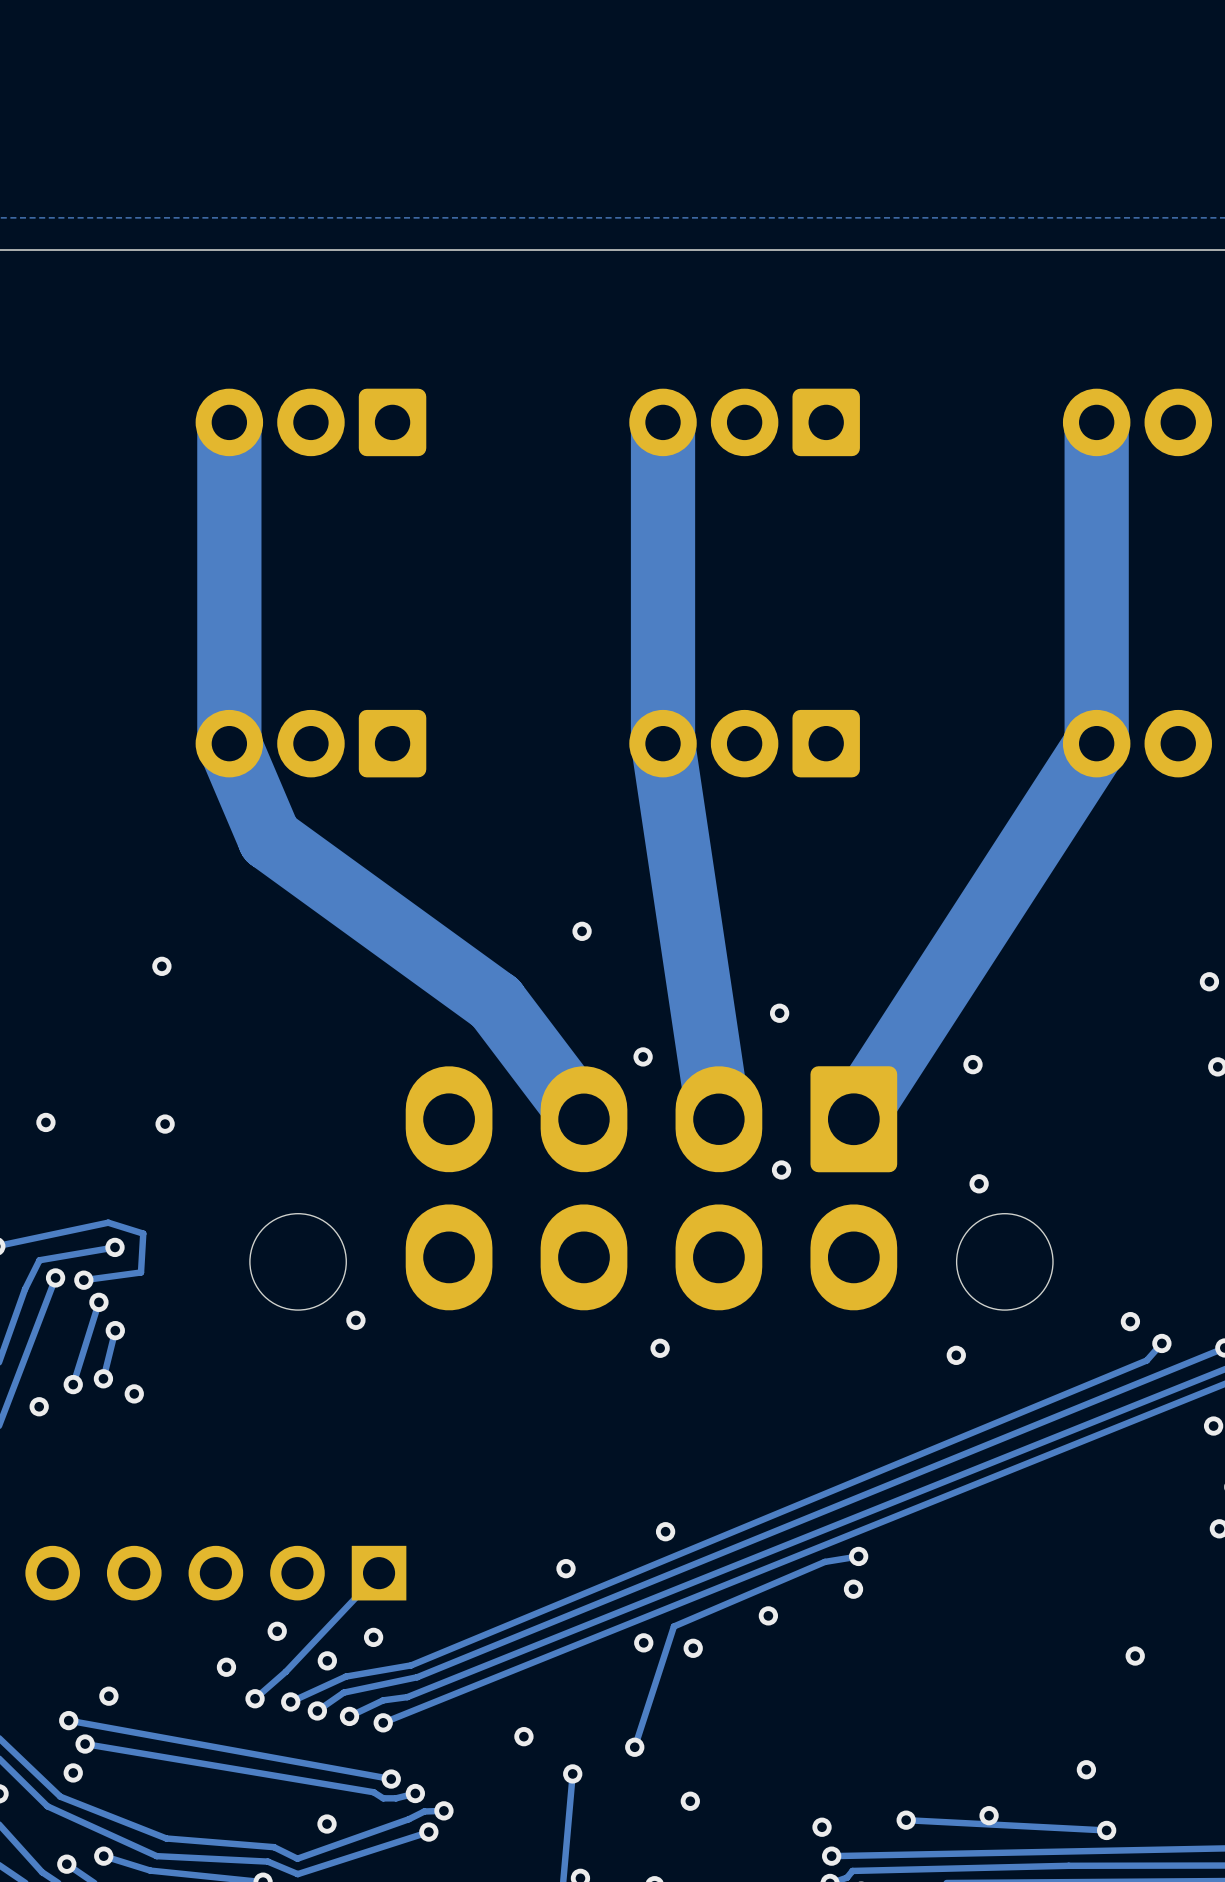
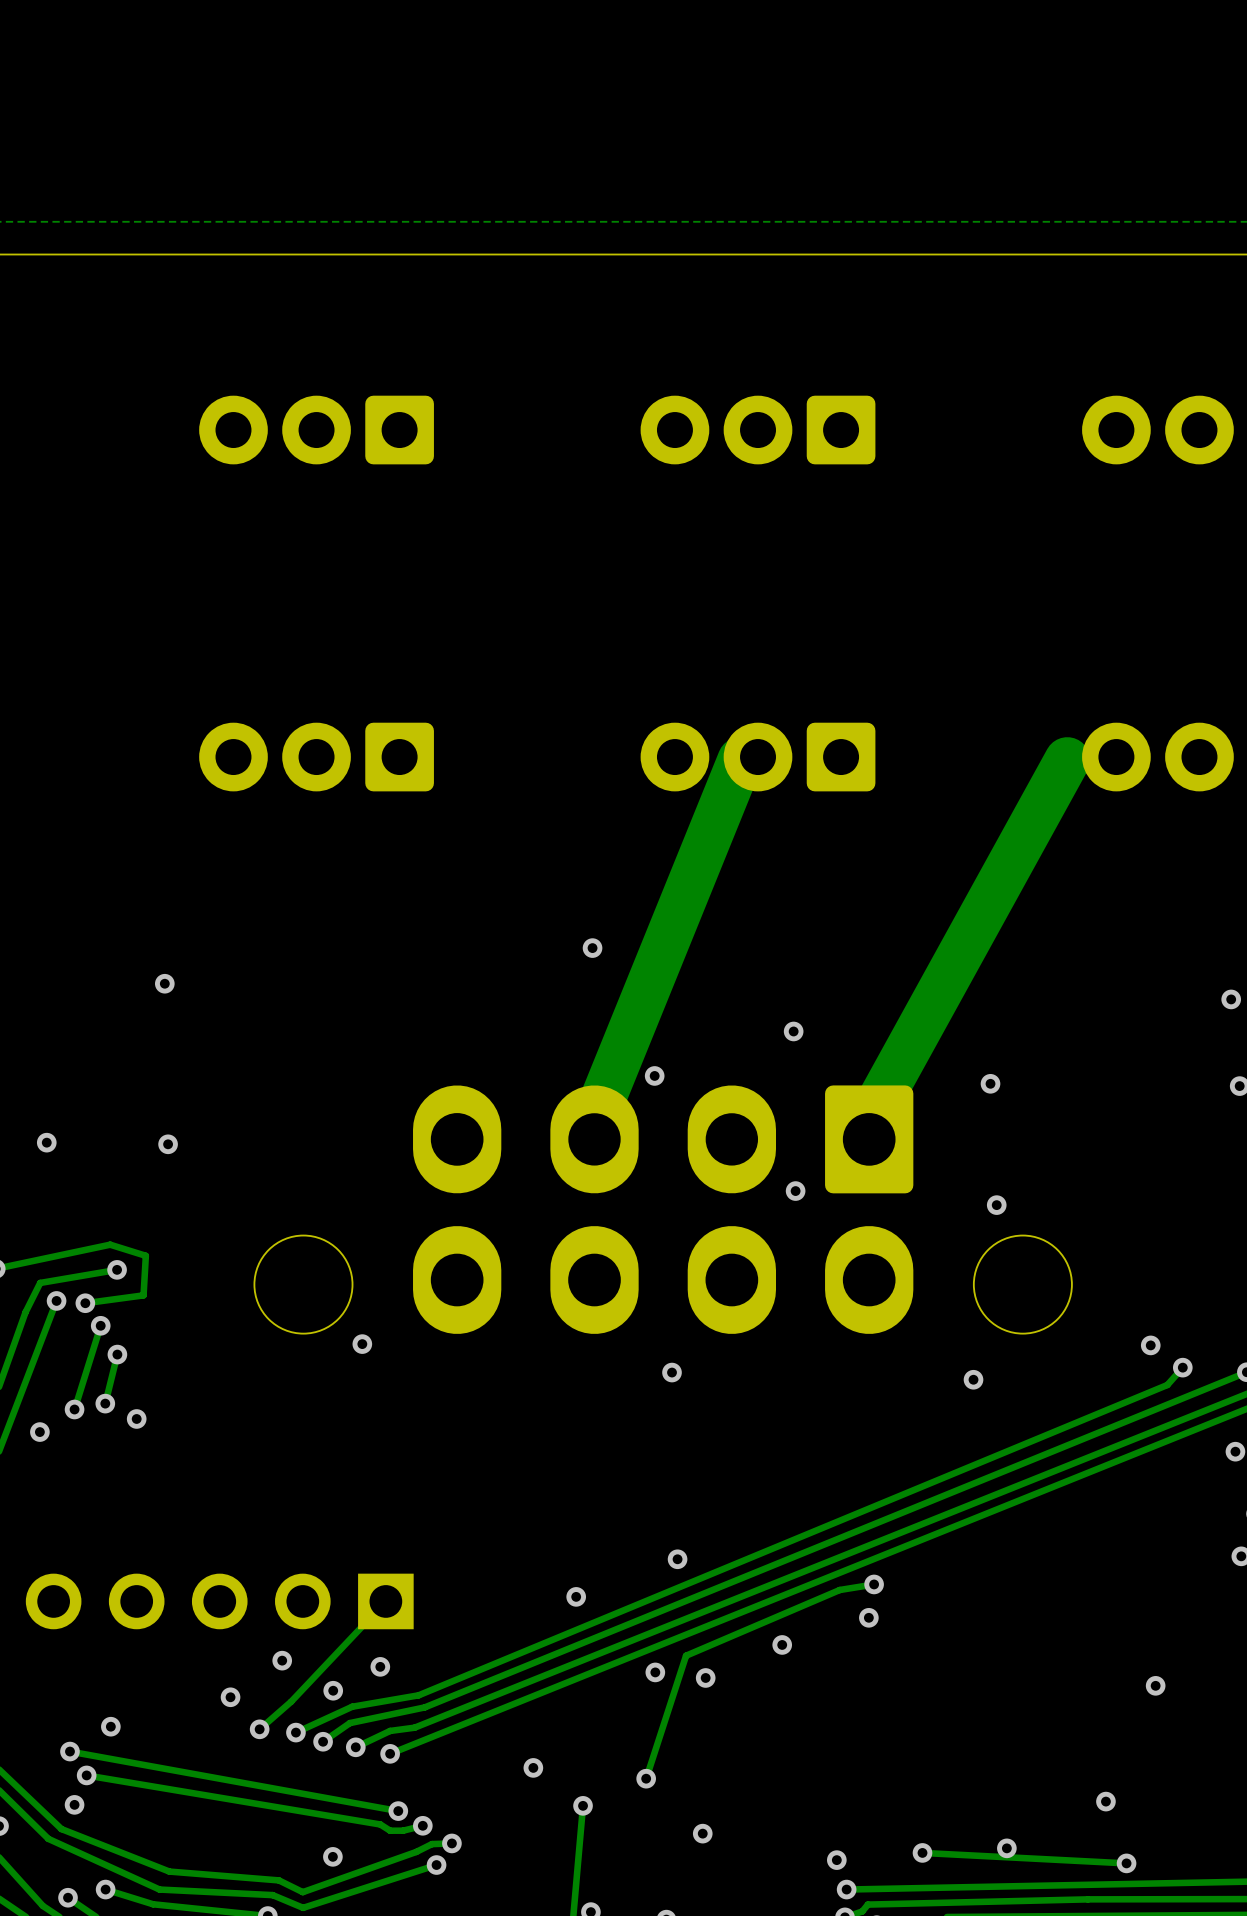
track: (229, 422) (229, 743) (269, 838) (495, 1002) (584, 1119) -> none
track: (663, 422) (663, 743) (718, 1119) -> none
track: (1096, 422) (1096, 743) (853, 1119) -> none
track: none -> (740, 760) (594, 1119)
track: none -> (1067, 760) (869, 1119)

